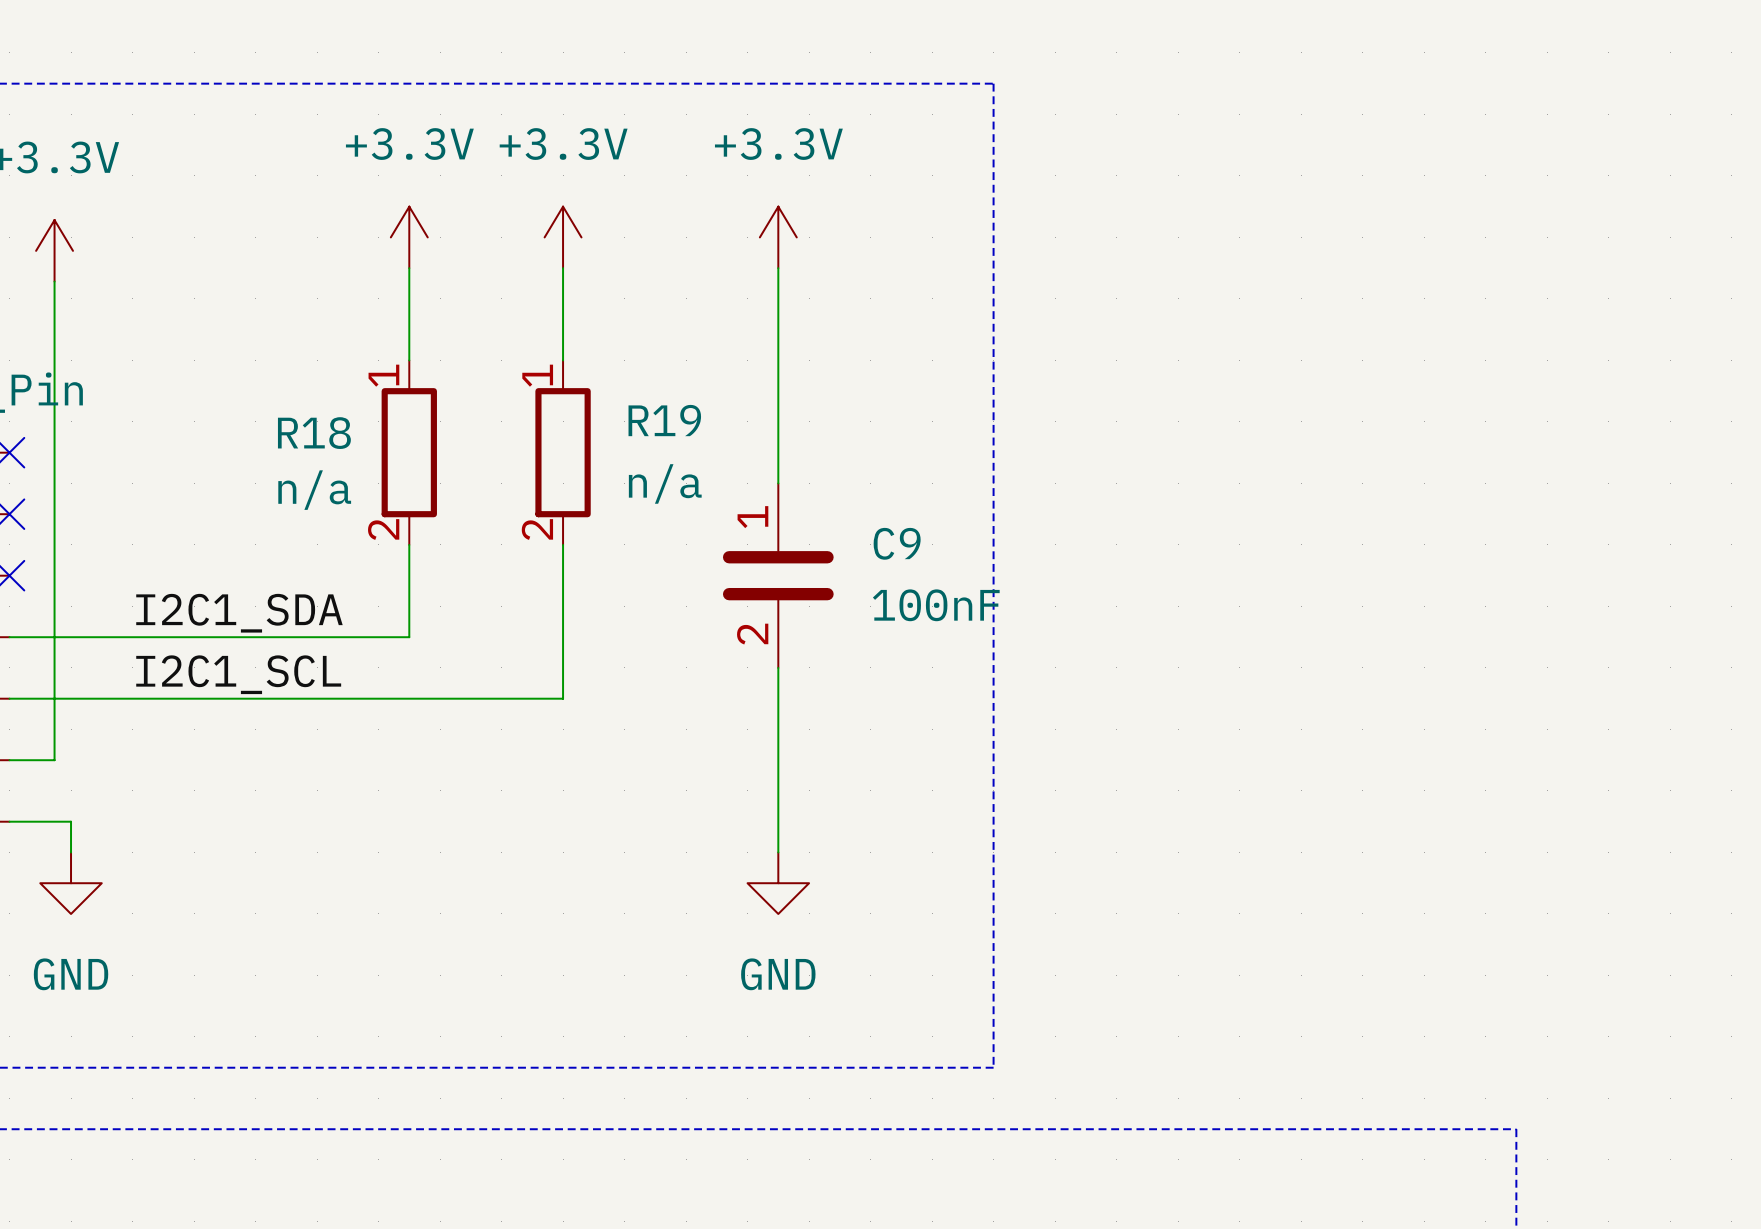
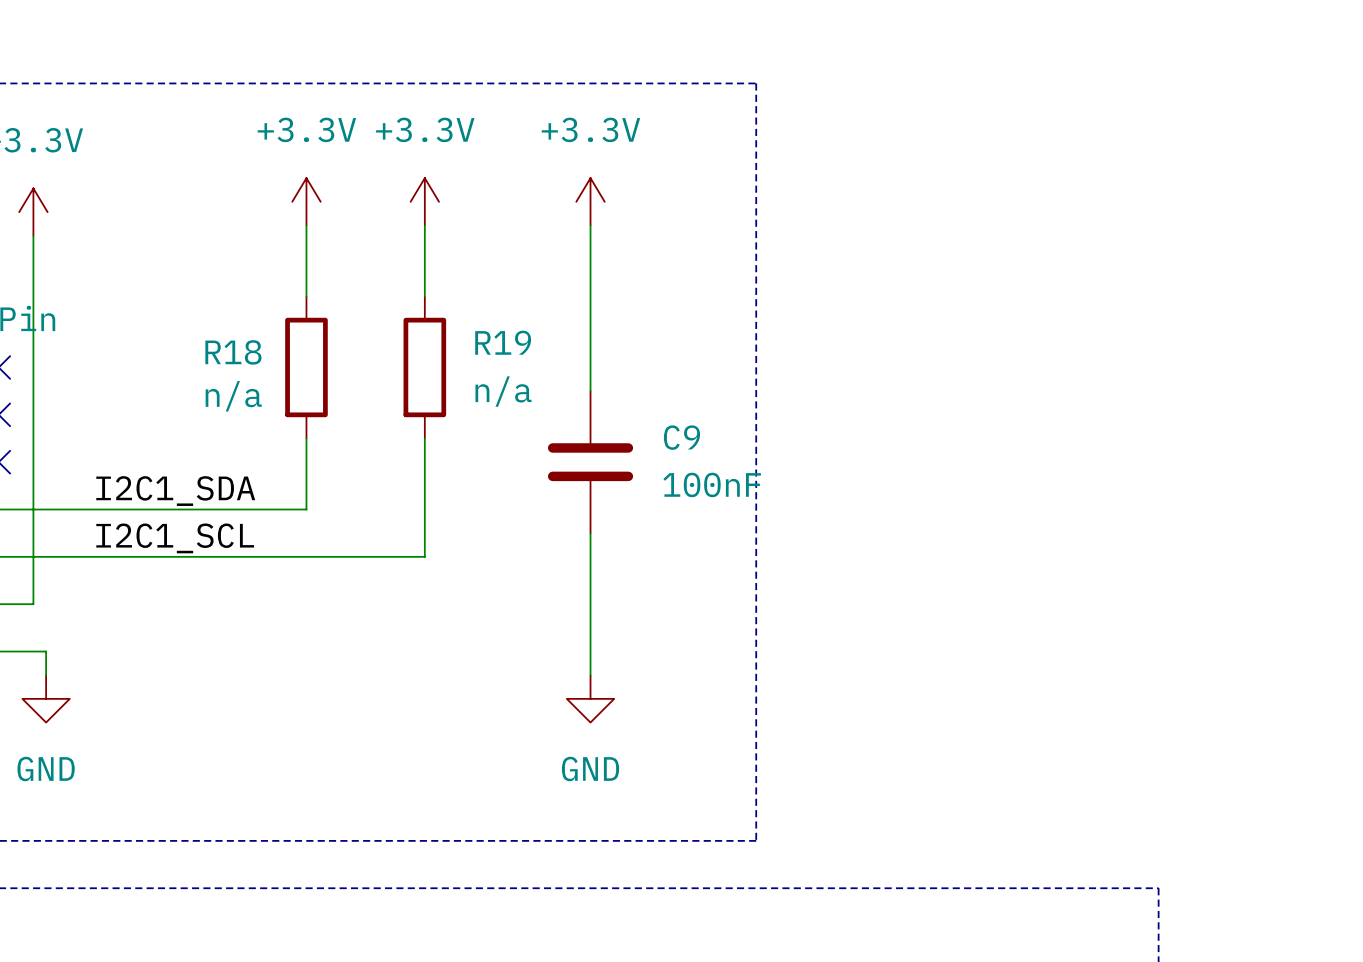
R18 pin number: 1 (383, 375) -> none
R19 pin number: 1 (537, 375) -> none
C9 pin number: 1 (752, 517) -> none
R18 pin number: 2 (383, 529) -> none
R19 pin number: 2 (537, 529) -> none
C9 pin number: 2 (752, 634) -> none

